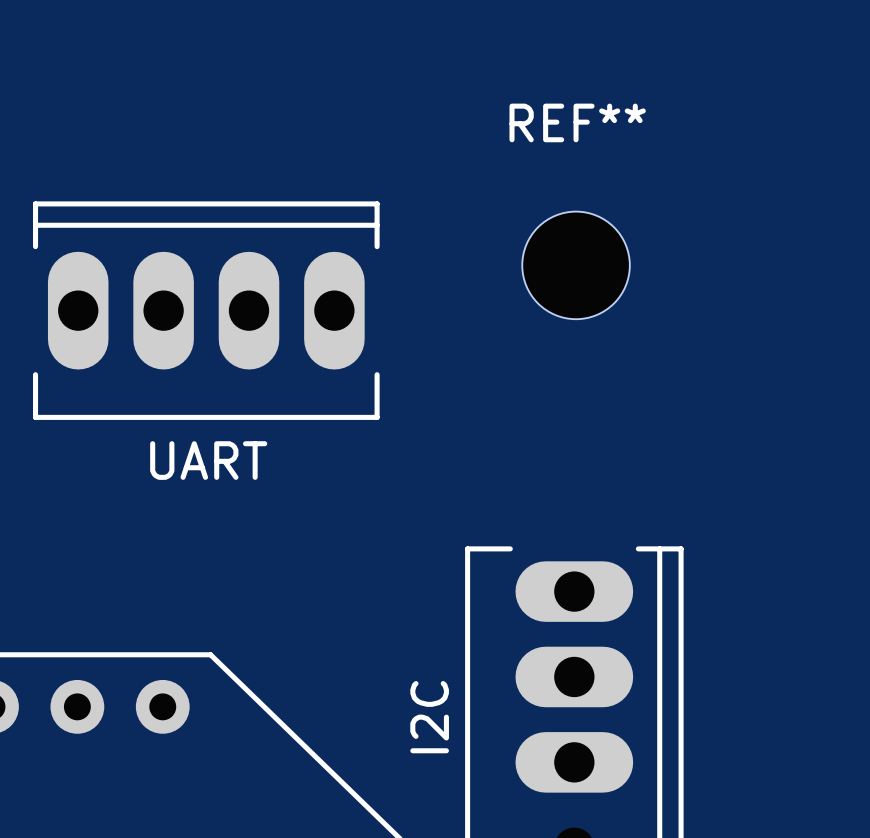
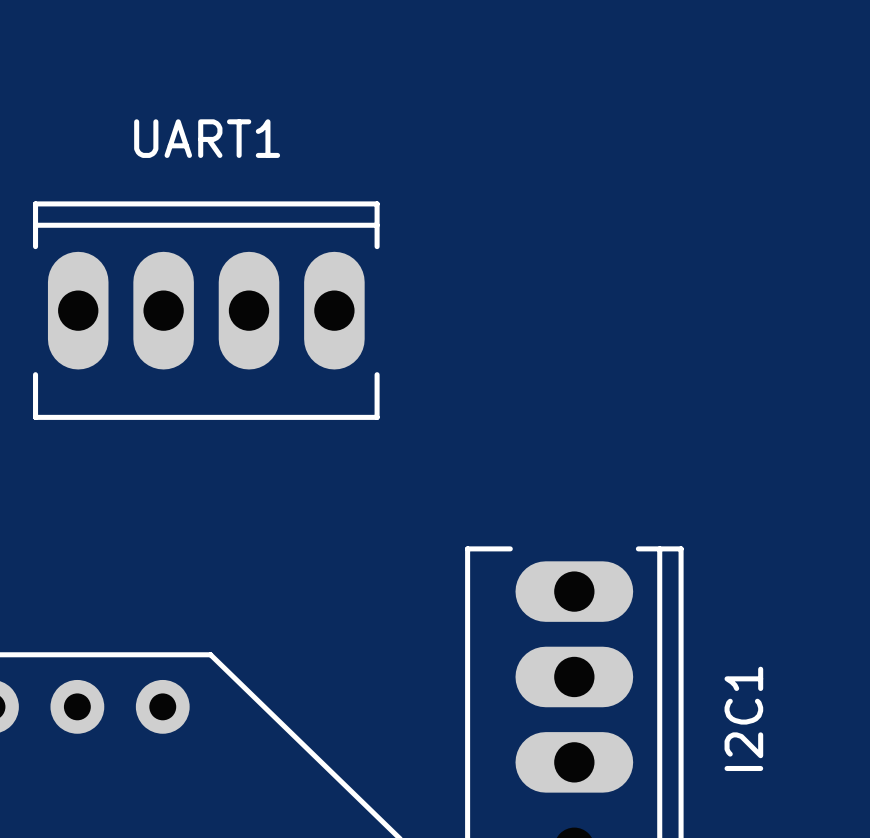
REF**: (576, 265) -> none
UART name: UART (208, 460) -> UART1 (207, 138)
I2C name: I2C (429, 717) -> I2C1 (743, 718)

